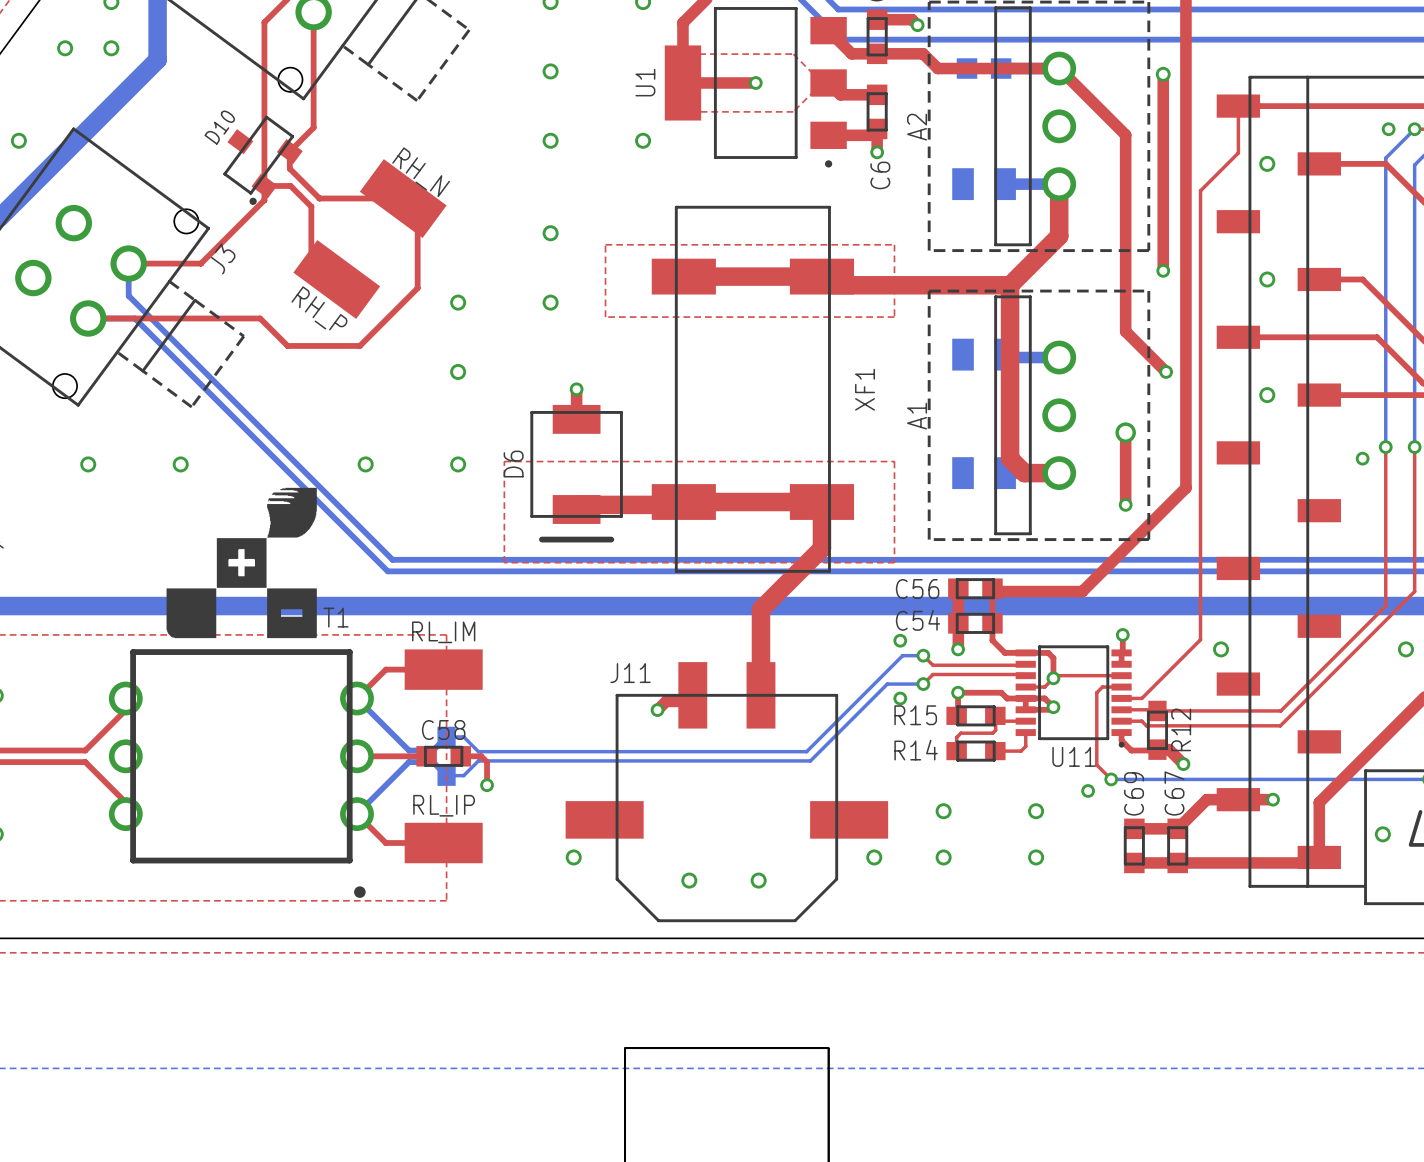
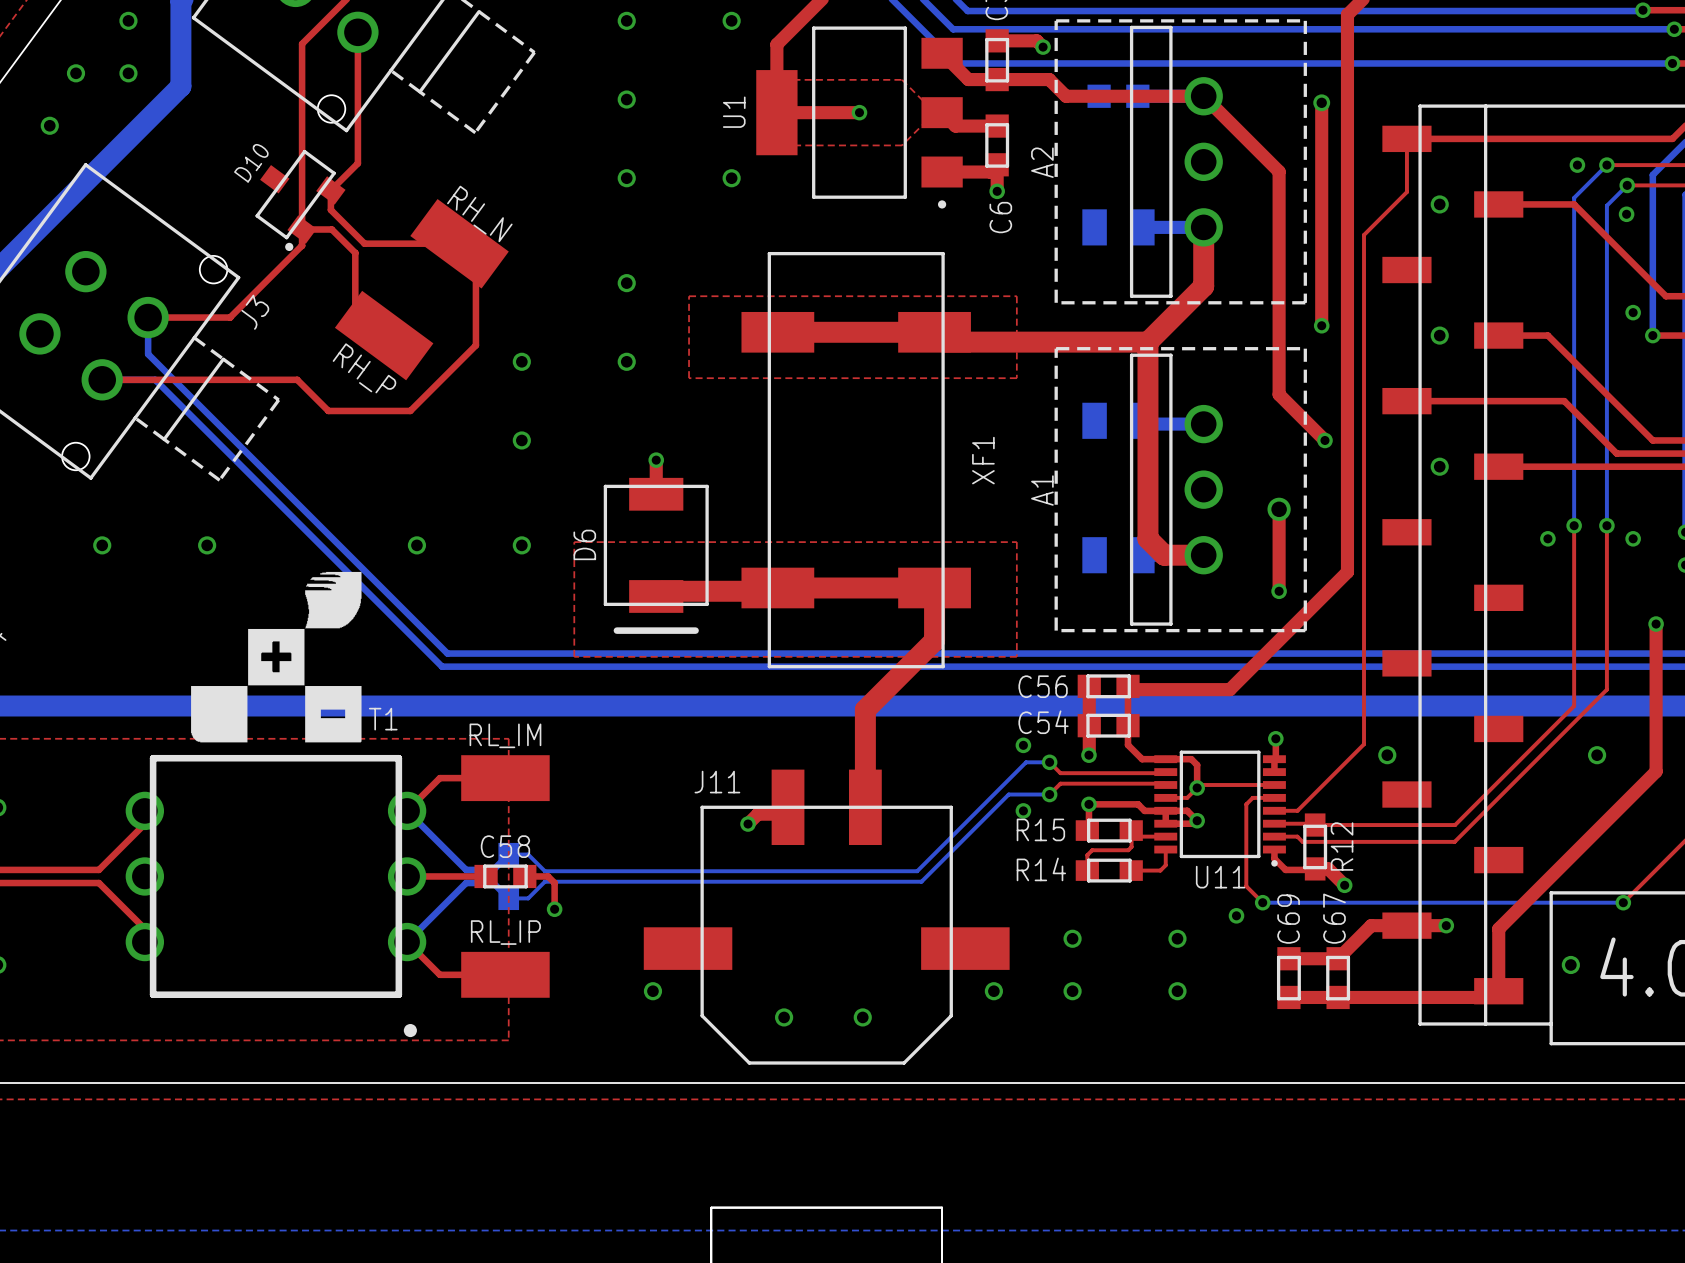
via position: (18, 140) -> (49, 125)

